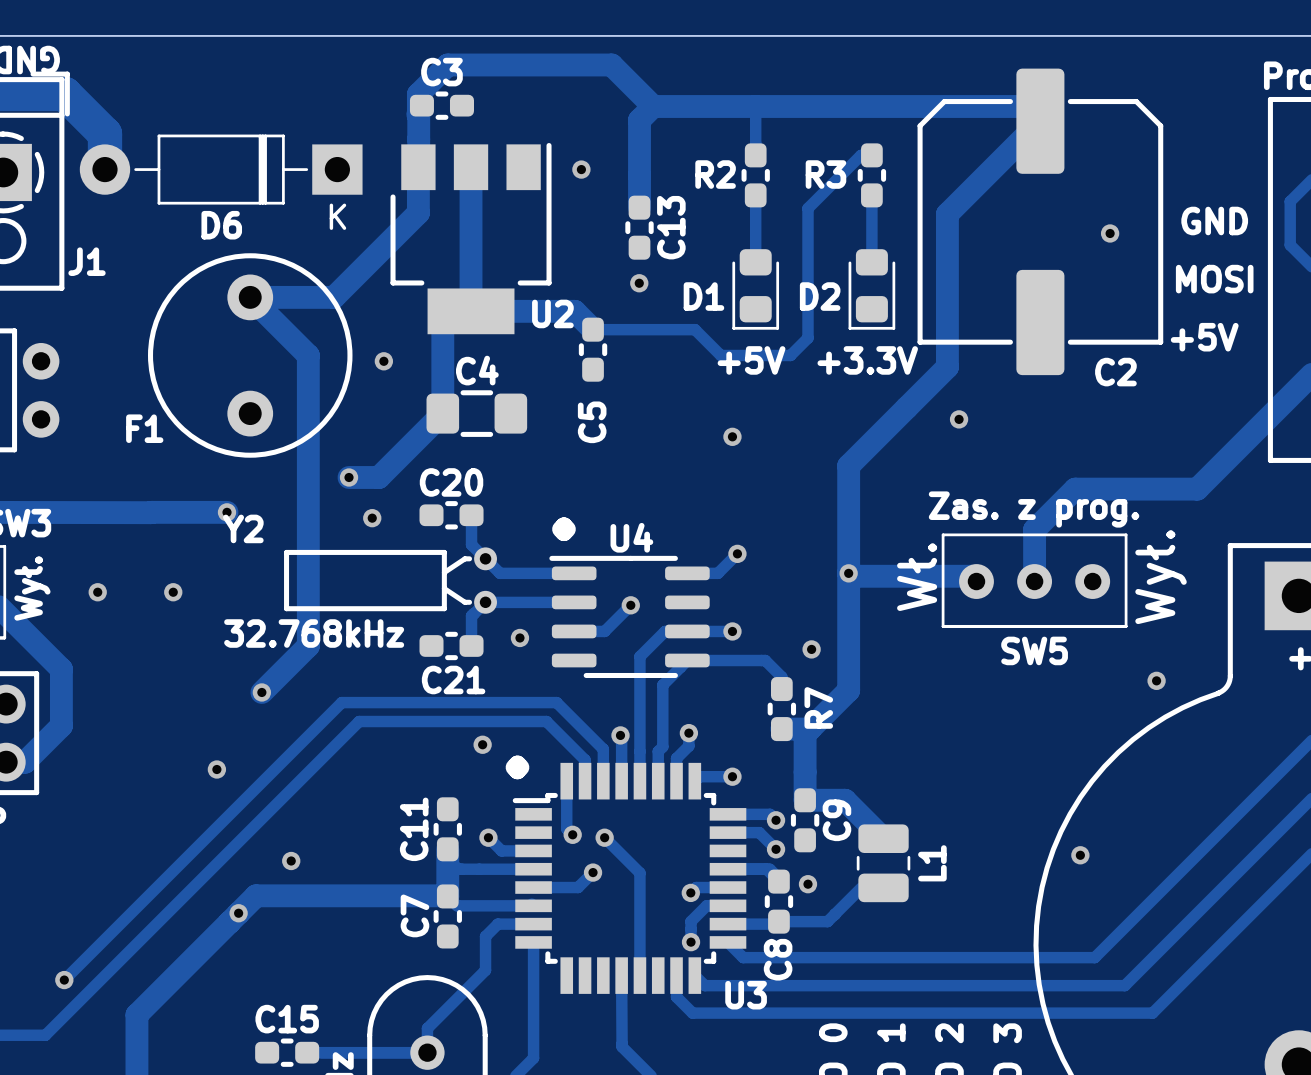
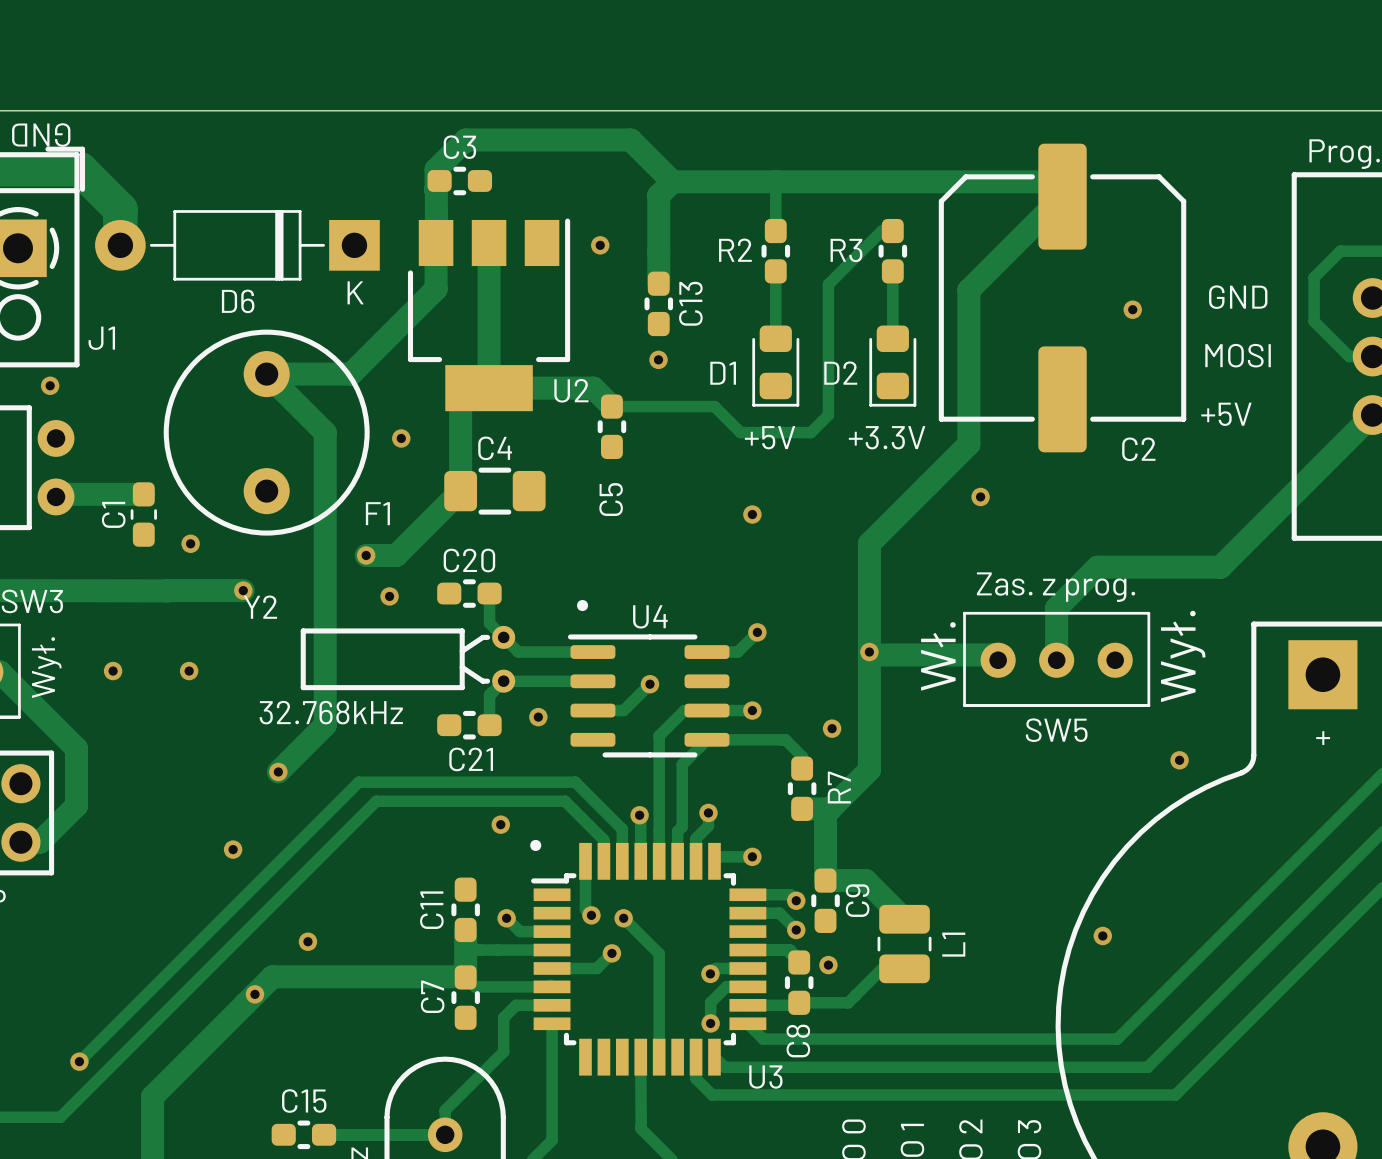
via: none -> (50, 385)
track: none -> (143, 494) (58, 494) (56, 496)
F1 name position: F1 (144, 428) -> F1 (377, 513)
C1: none -> (143, 514)
via: none -> (190, 543)

